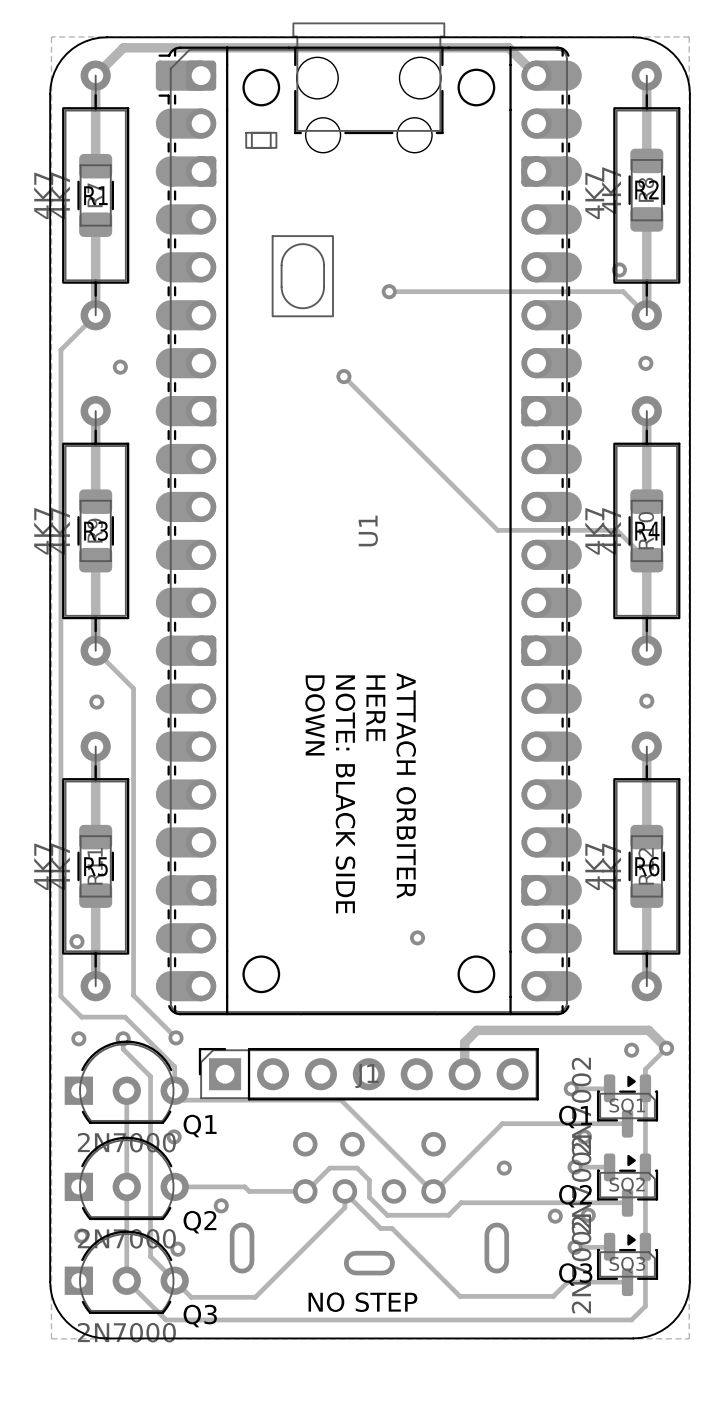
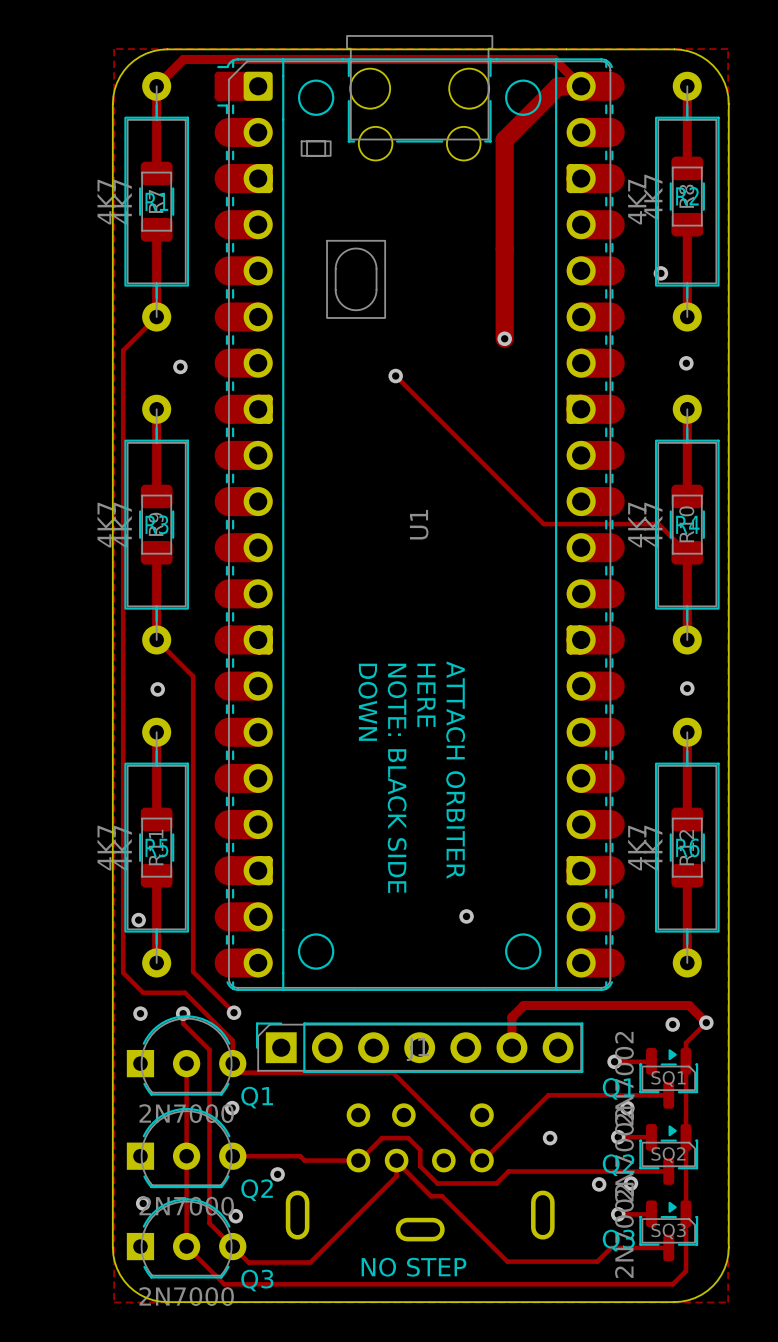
track: none -> (581, 86) (558, 86) (504, 139) (504, 338)
track: (389, 291) (623, 291) (646, 315) -> none
via position: (389, 291) -> (504, 338)

